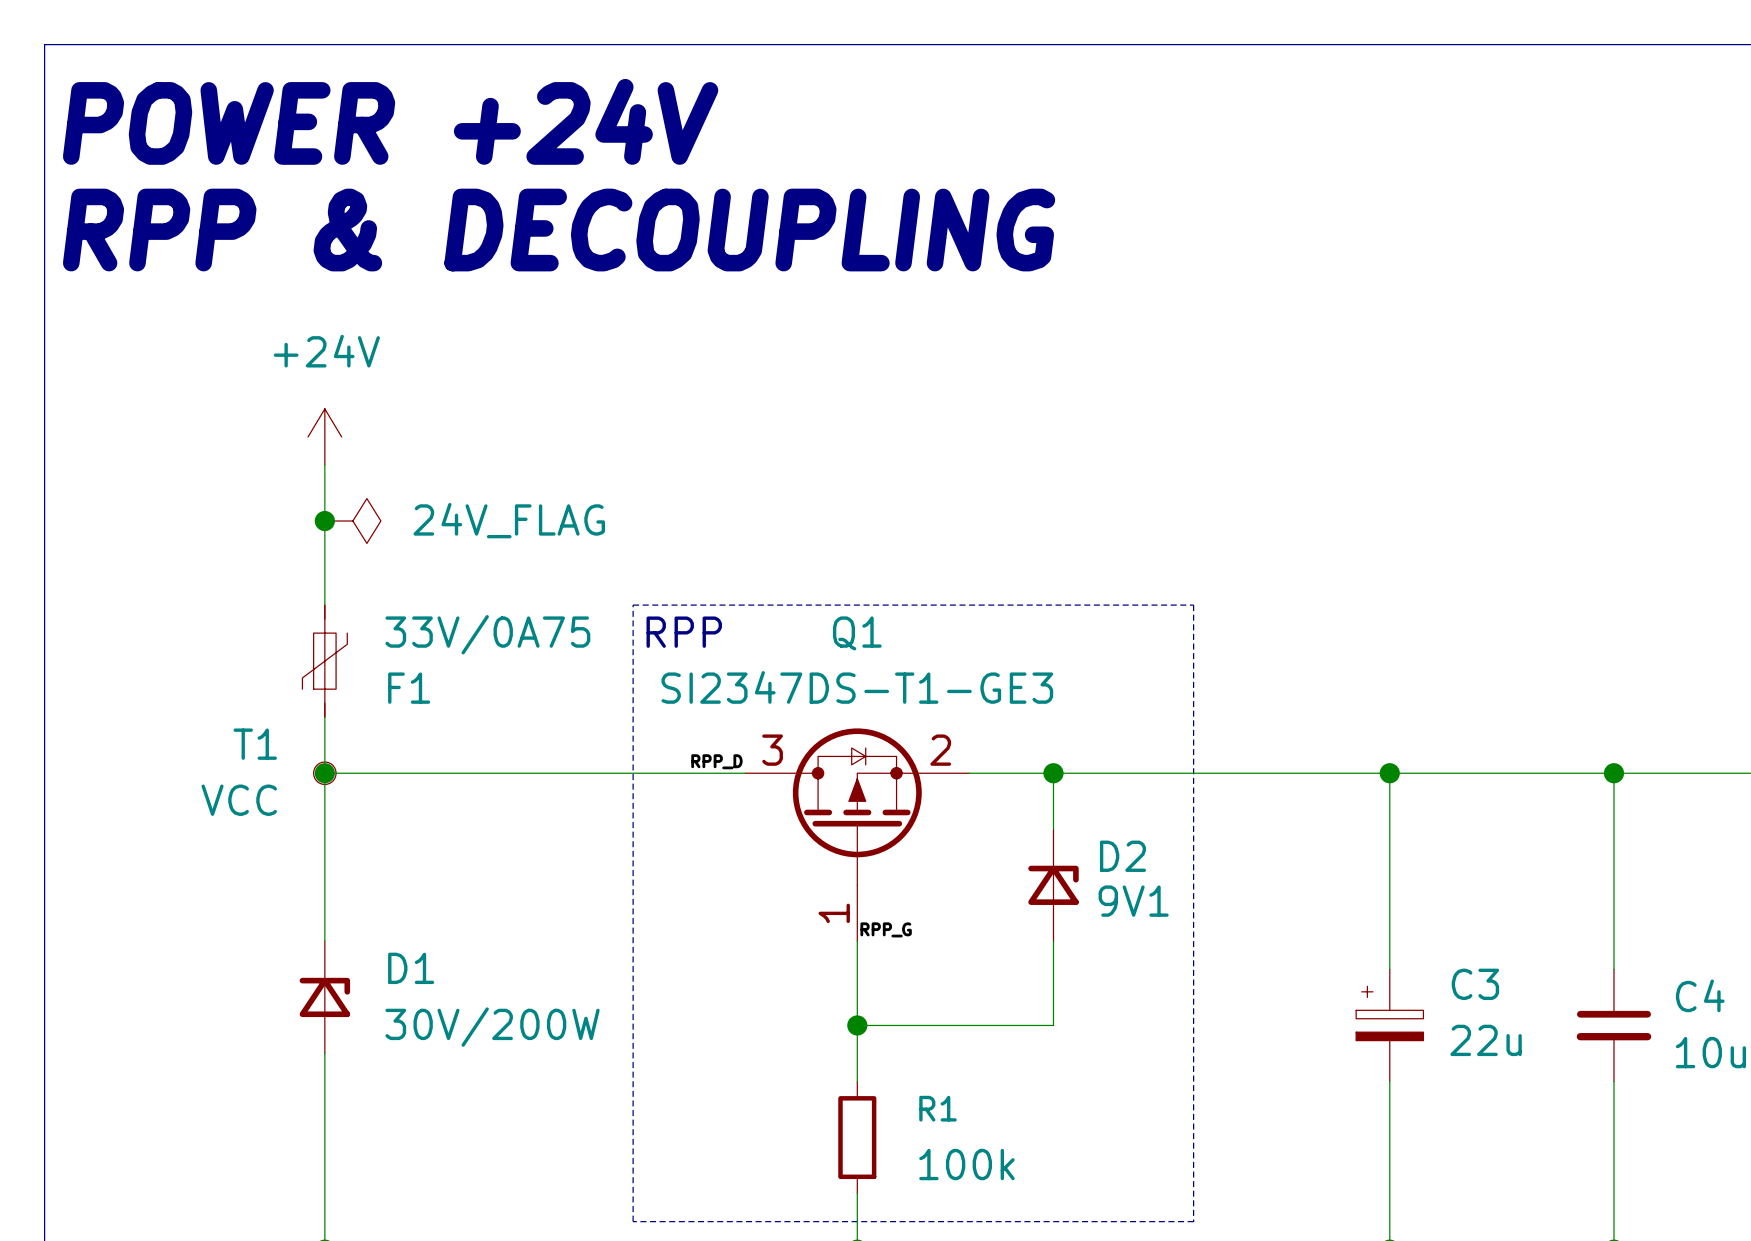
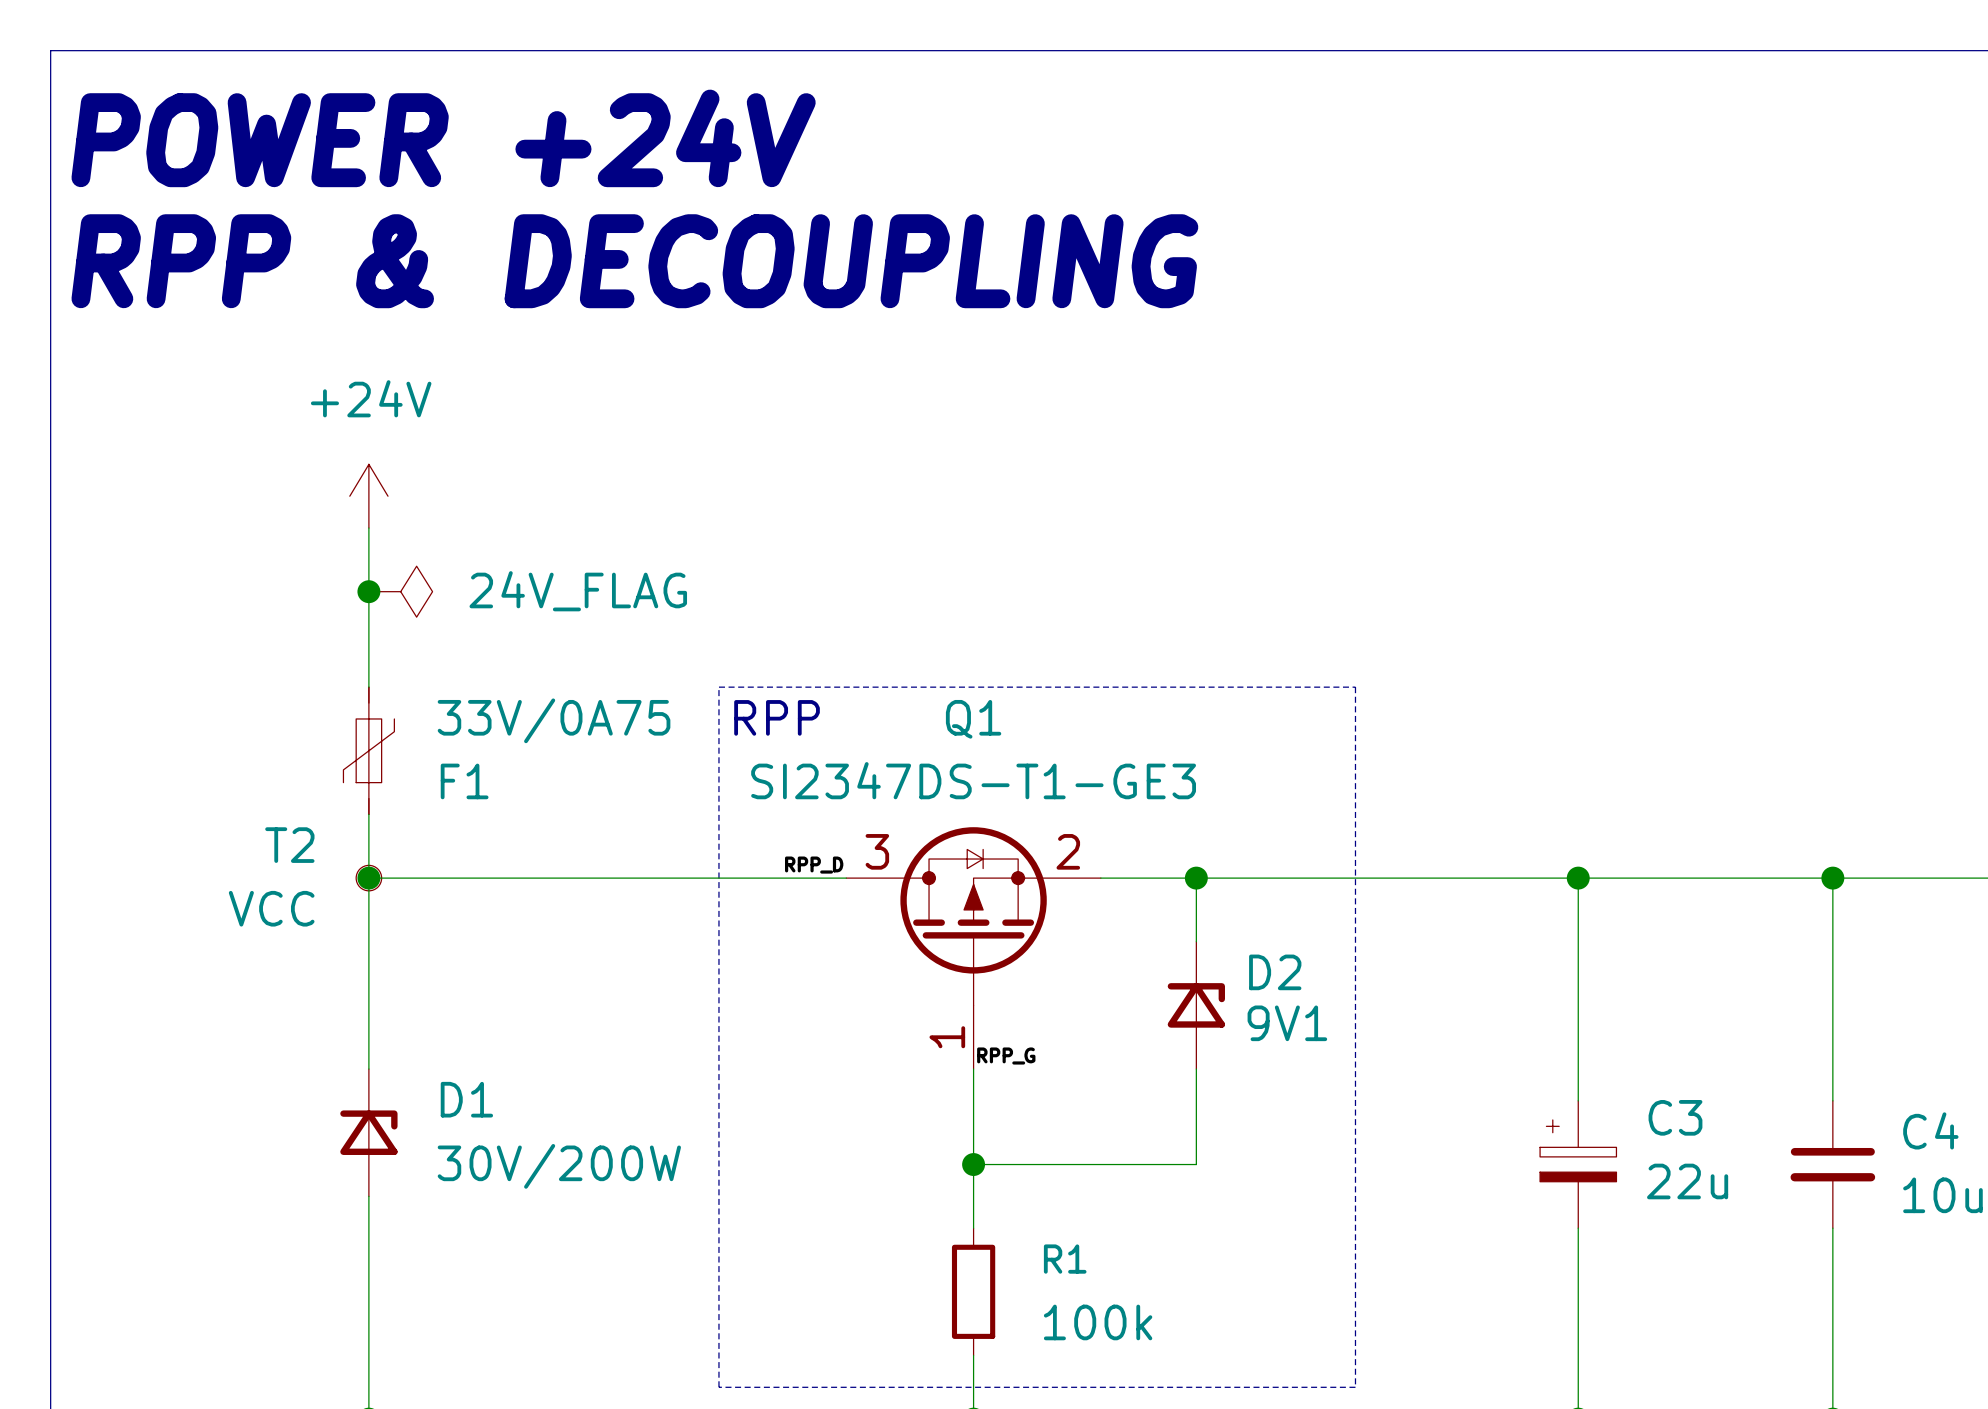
T1 name: T1 (255, 744) -> T2 (289, 845)

